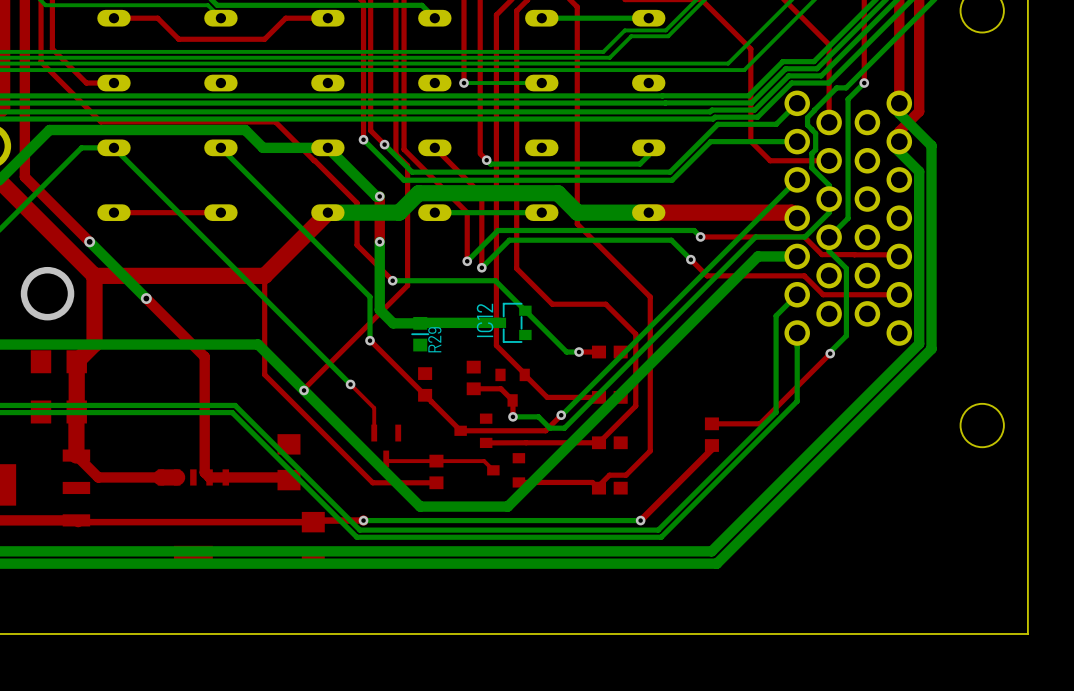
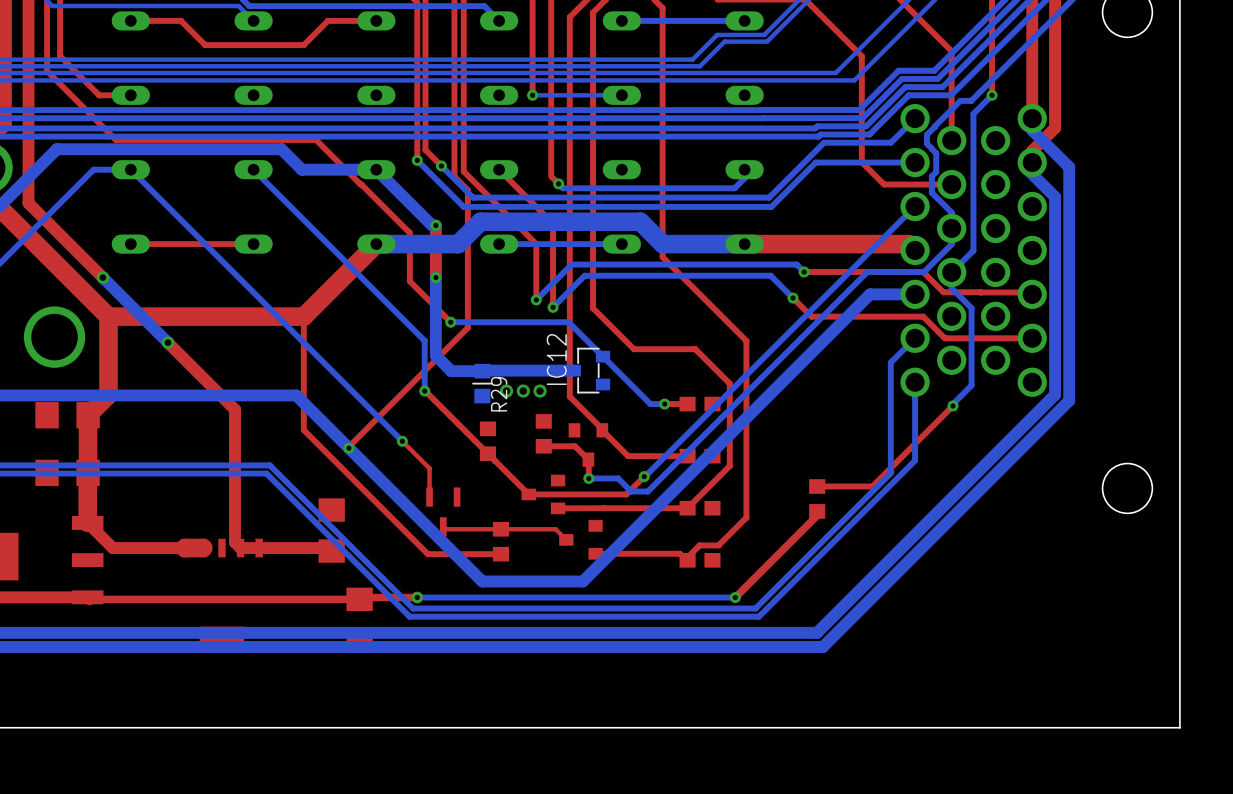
via: none -> (506, 391)
via: none -> (523, 391)
via: none -> (540, 391)

